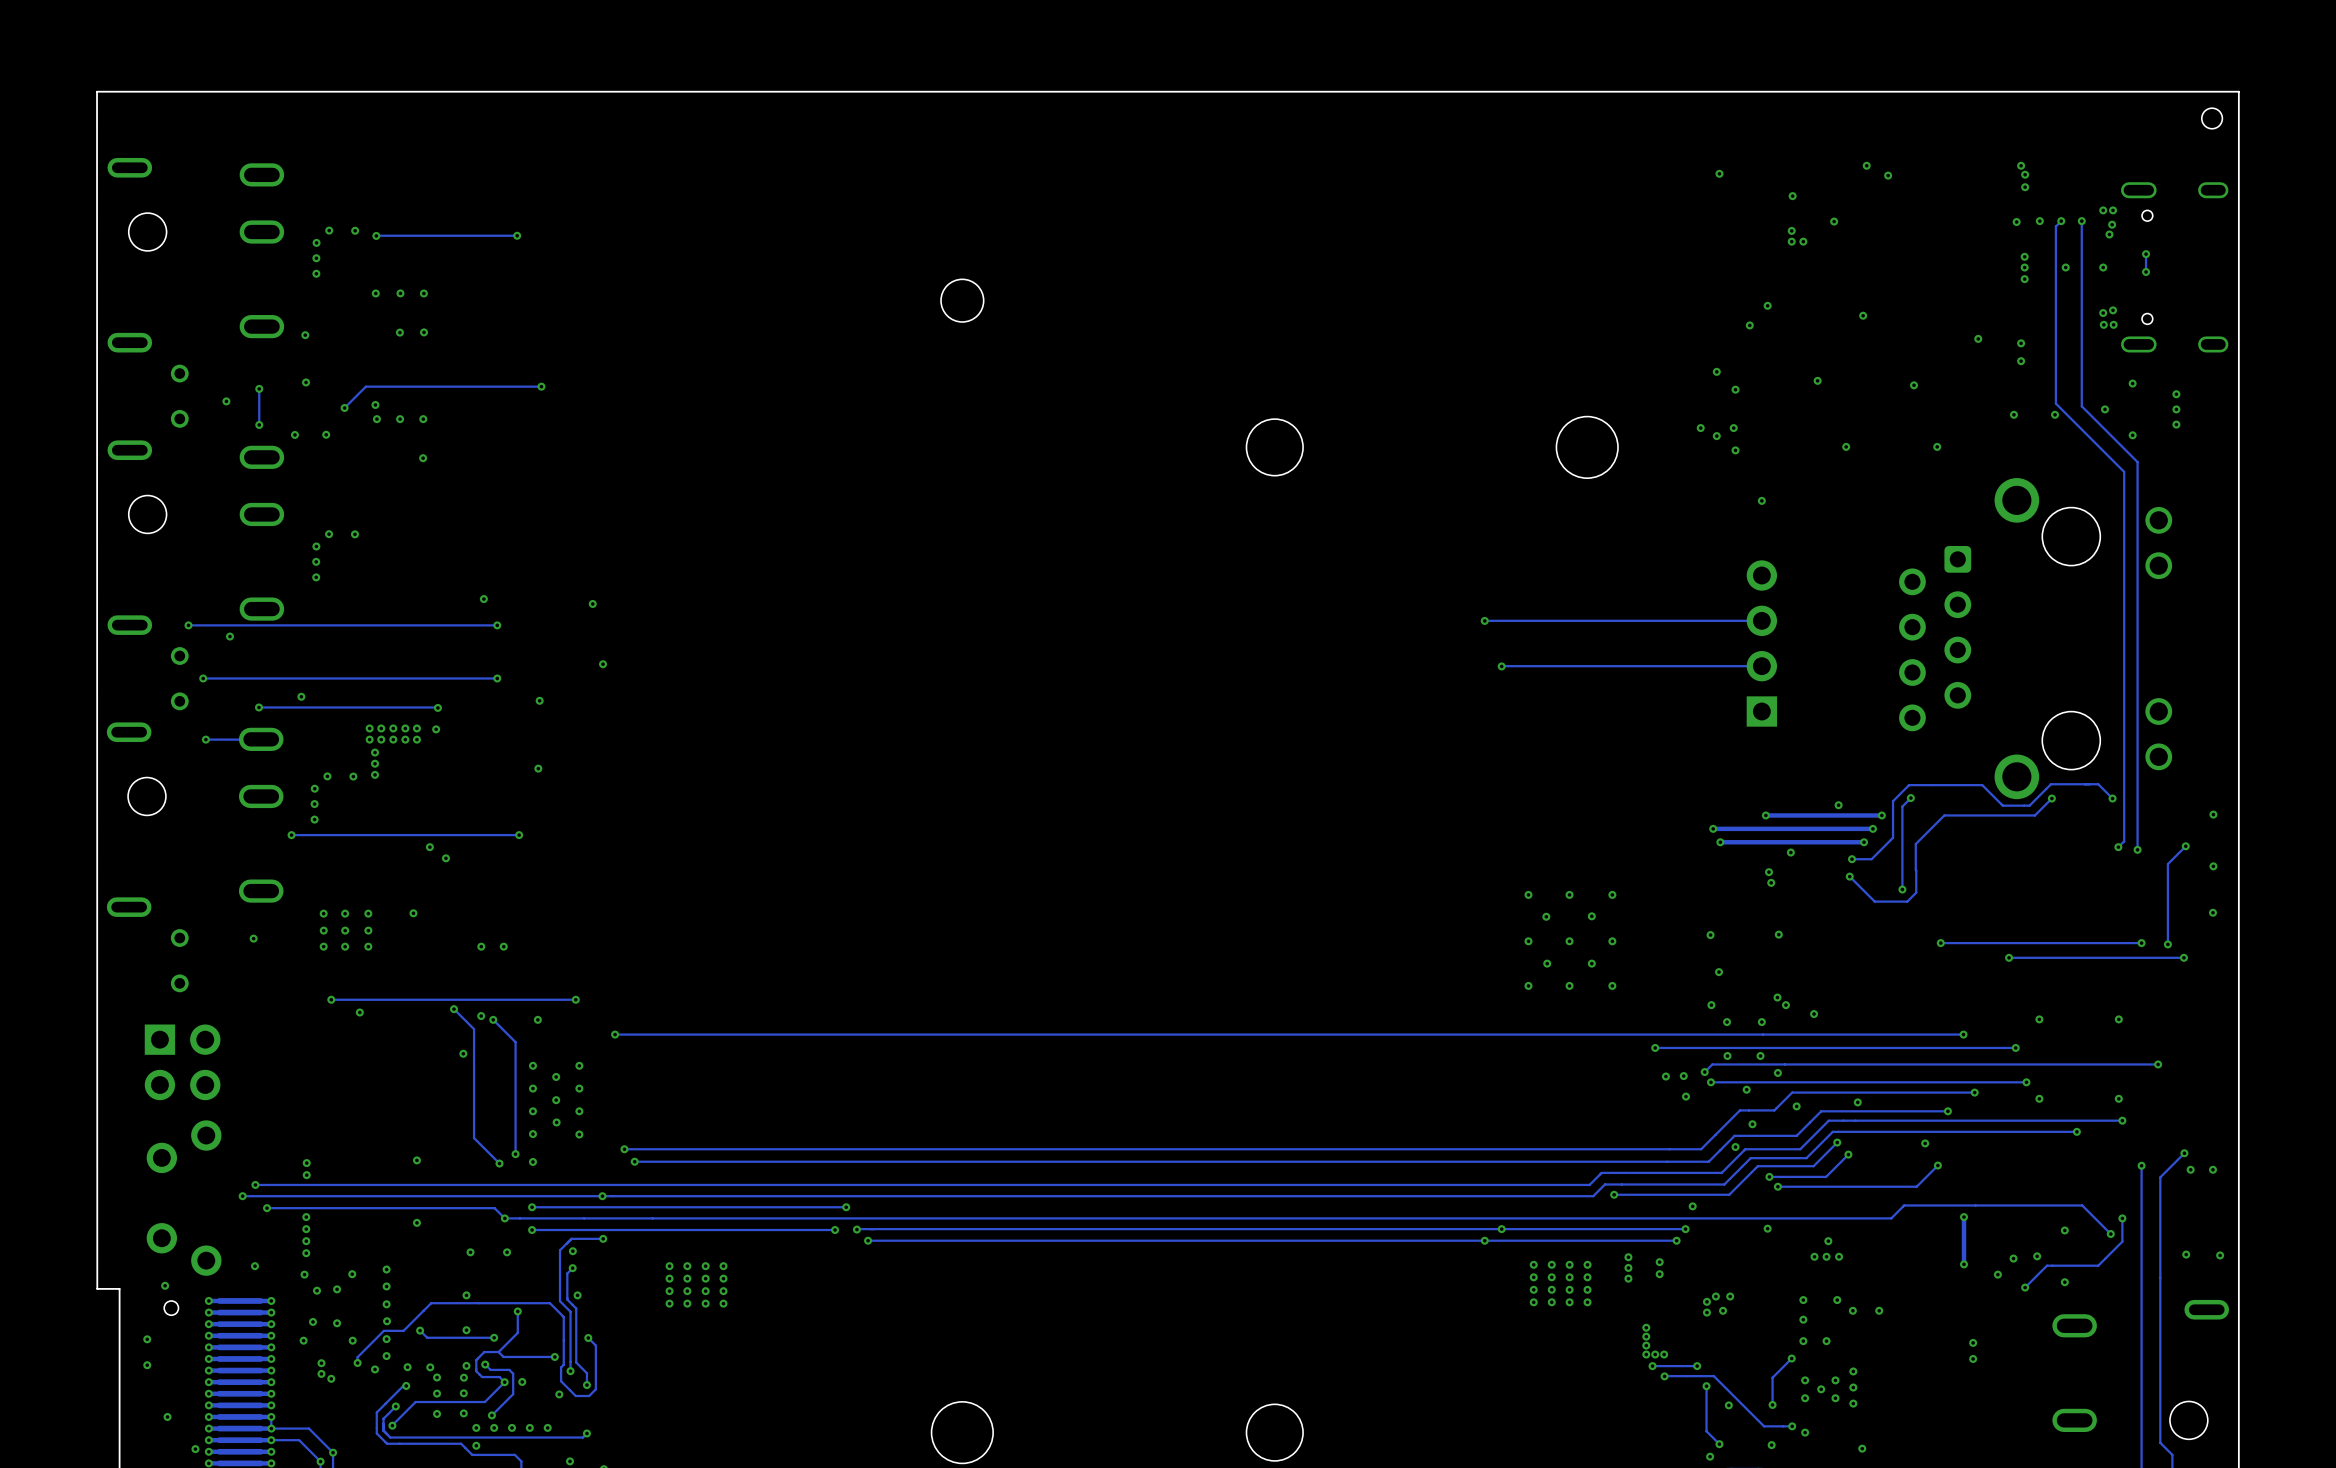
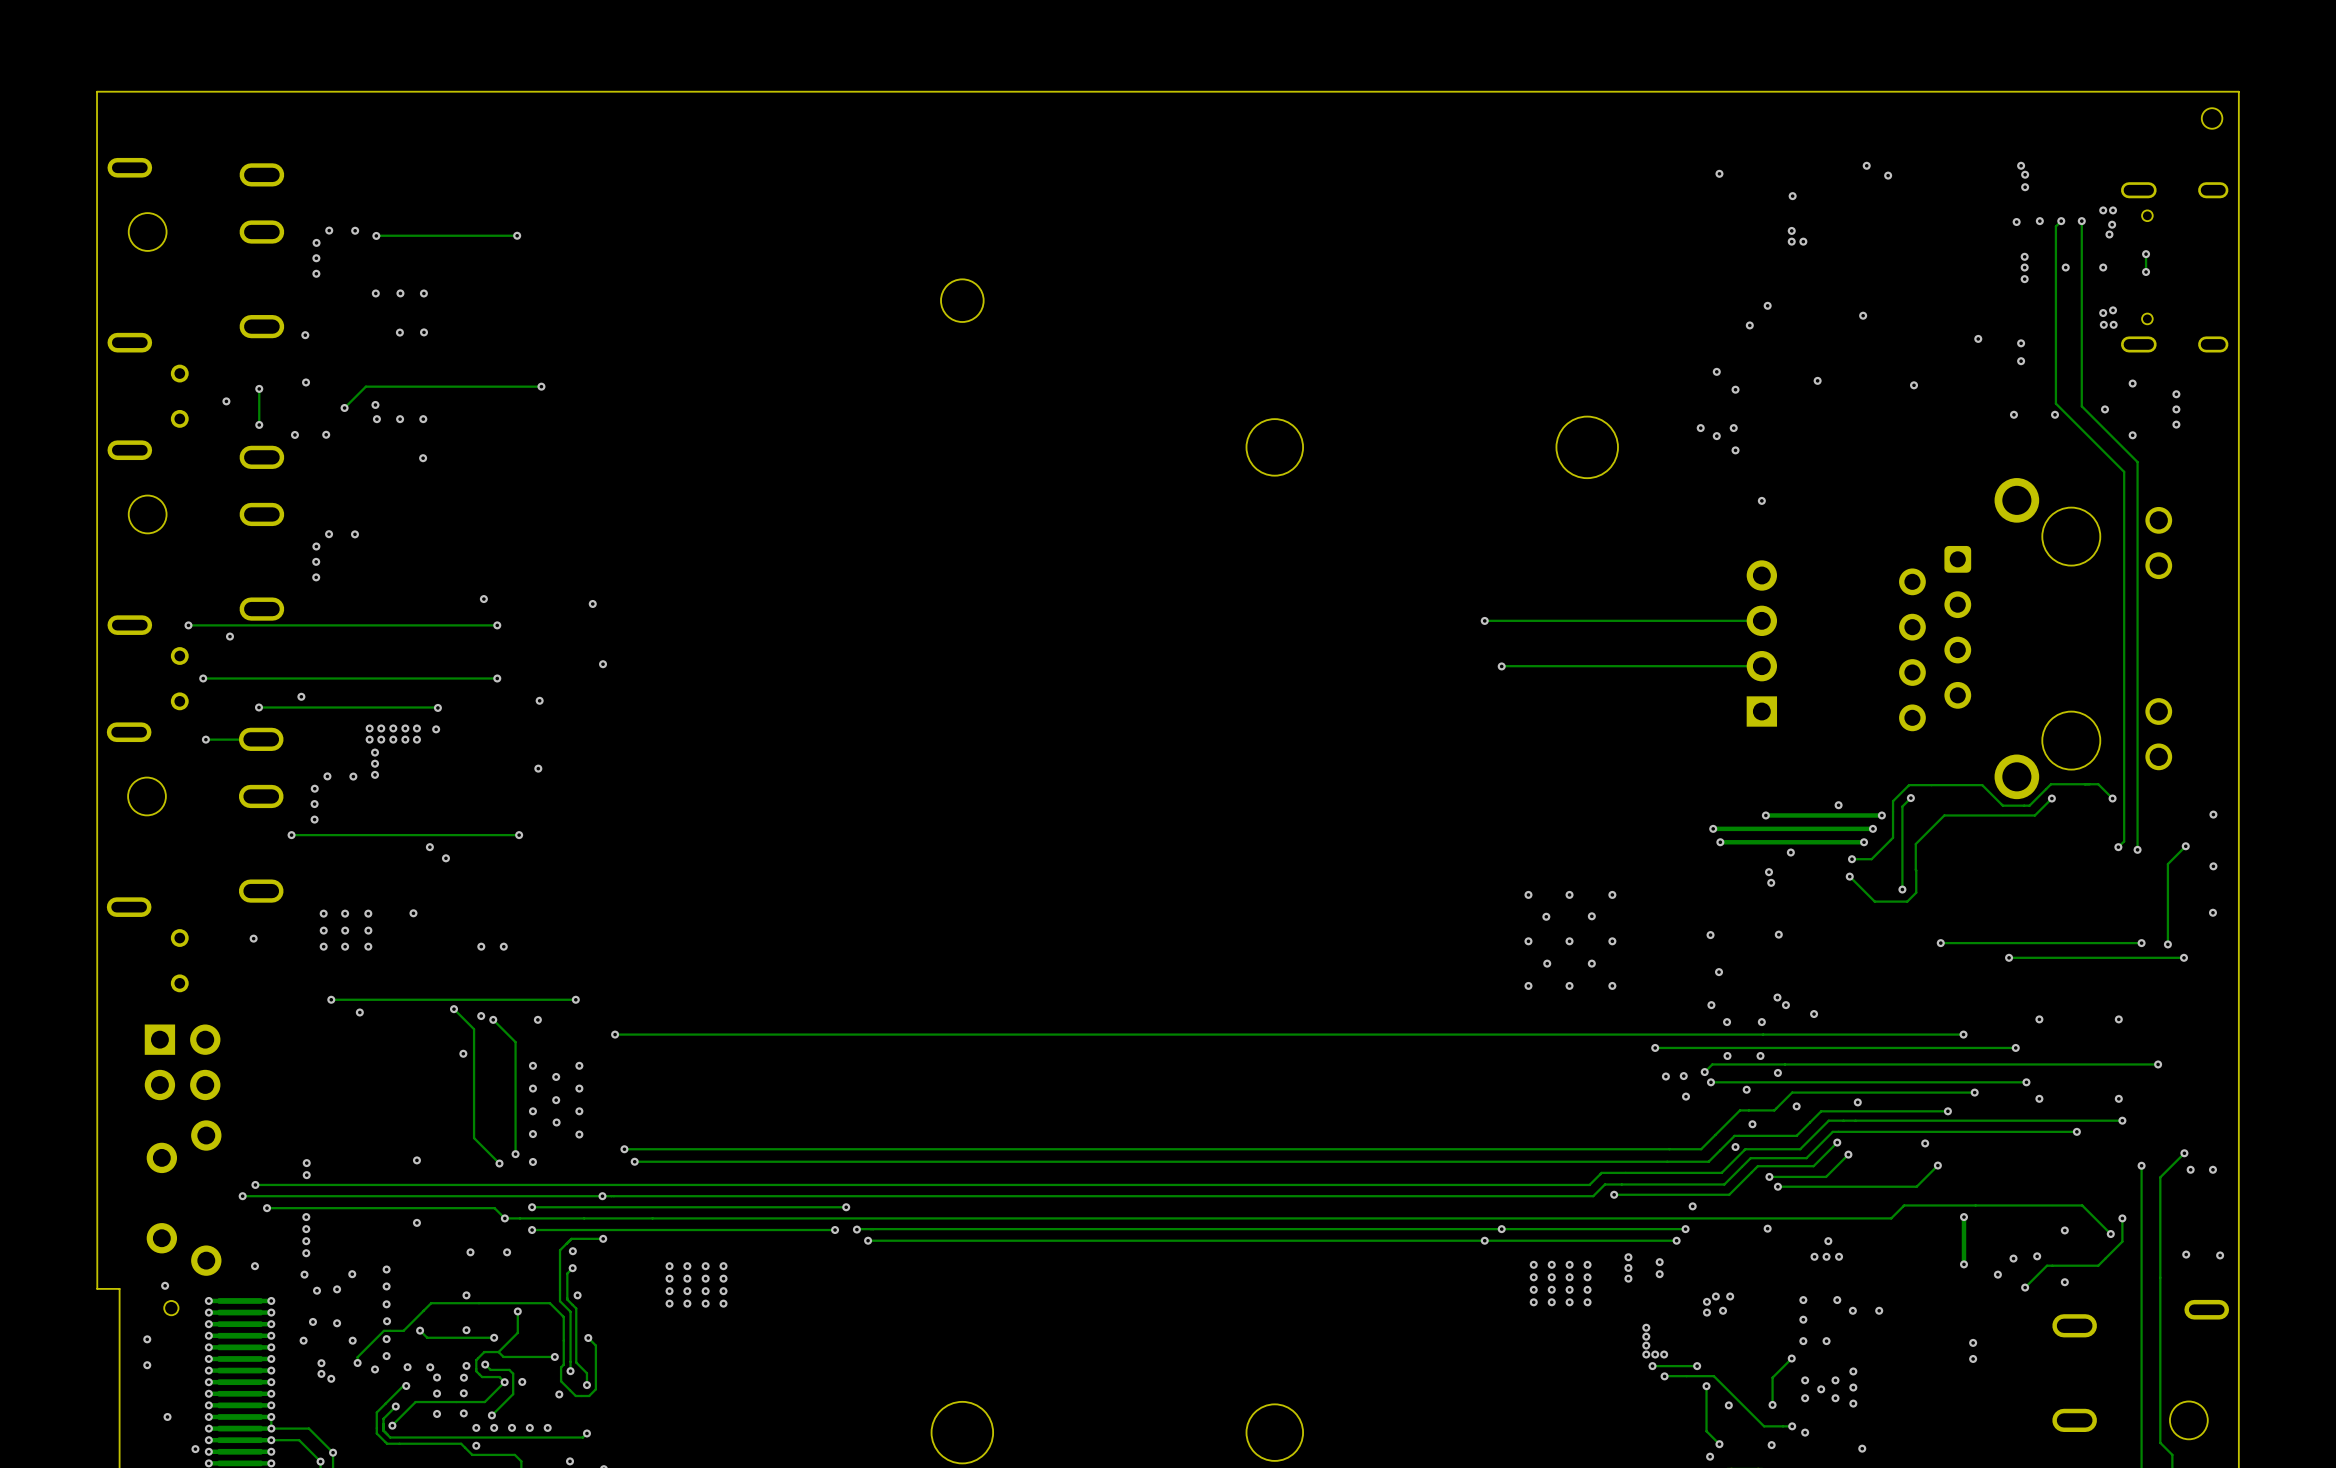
via: (1834, 221) -> none
via: (1846, 446) -> none
via: (1937, 446) -> none

